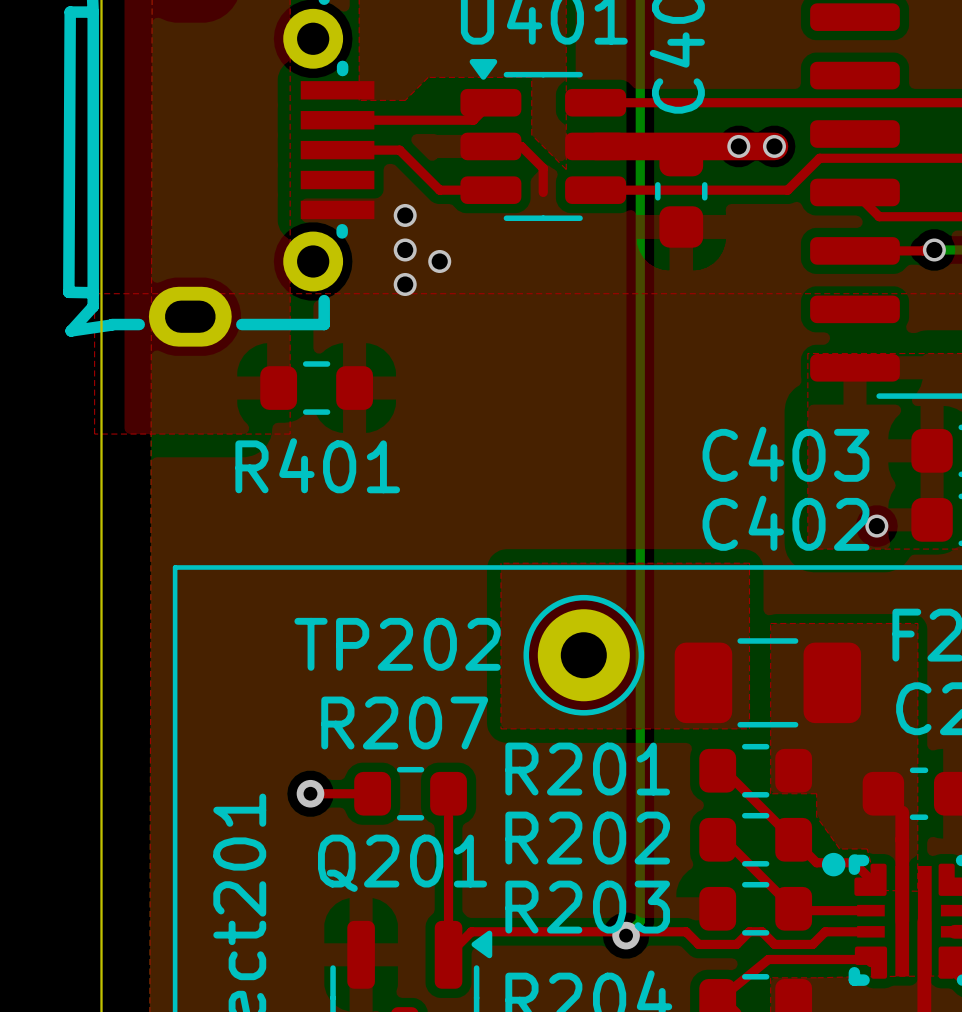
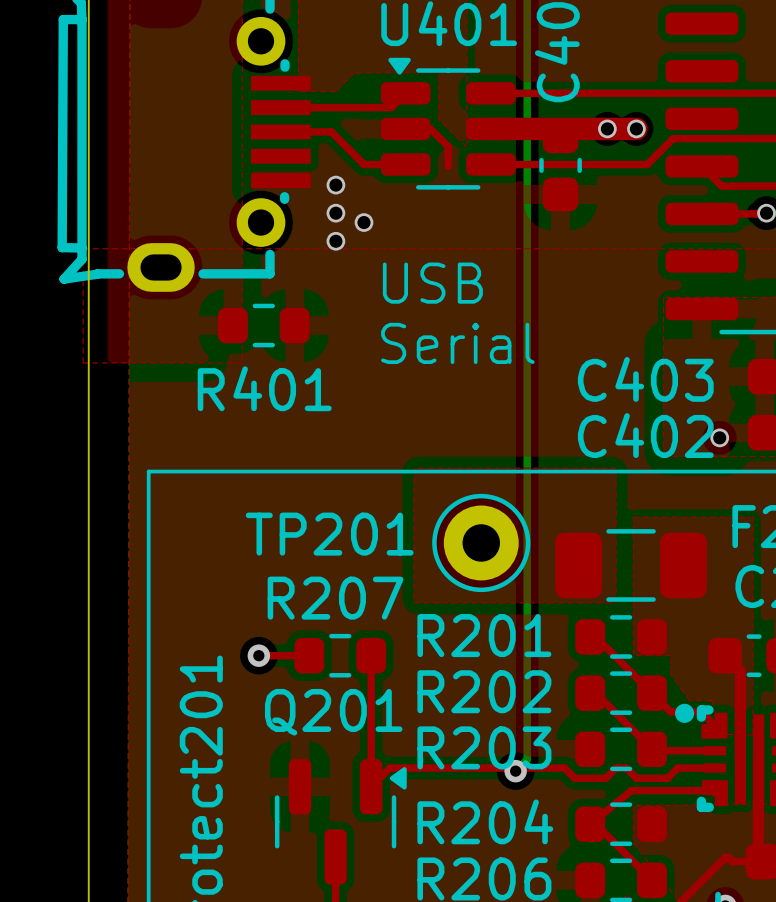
text: none -> USB (432, 283)
text: none -> Serial (457, 343)
TP202 name: TP202 (397, 644) -> TP201 (329, 534)

